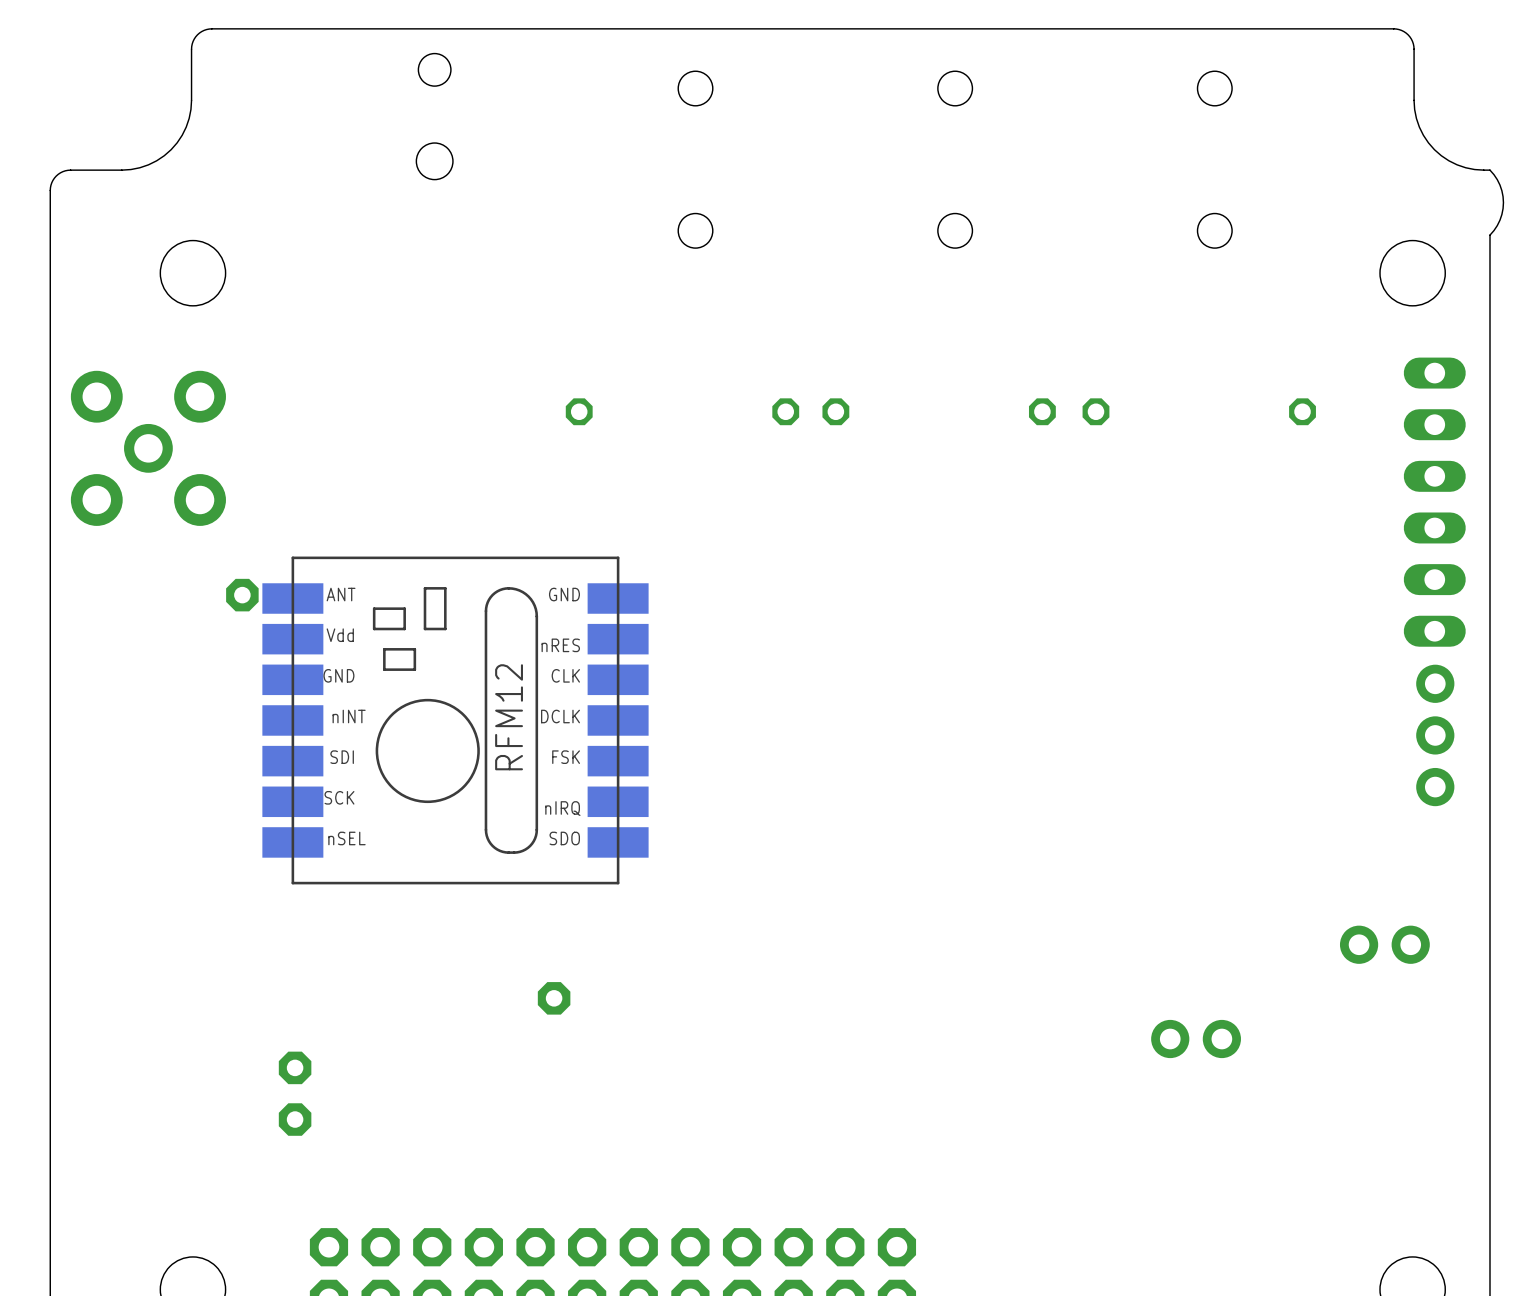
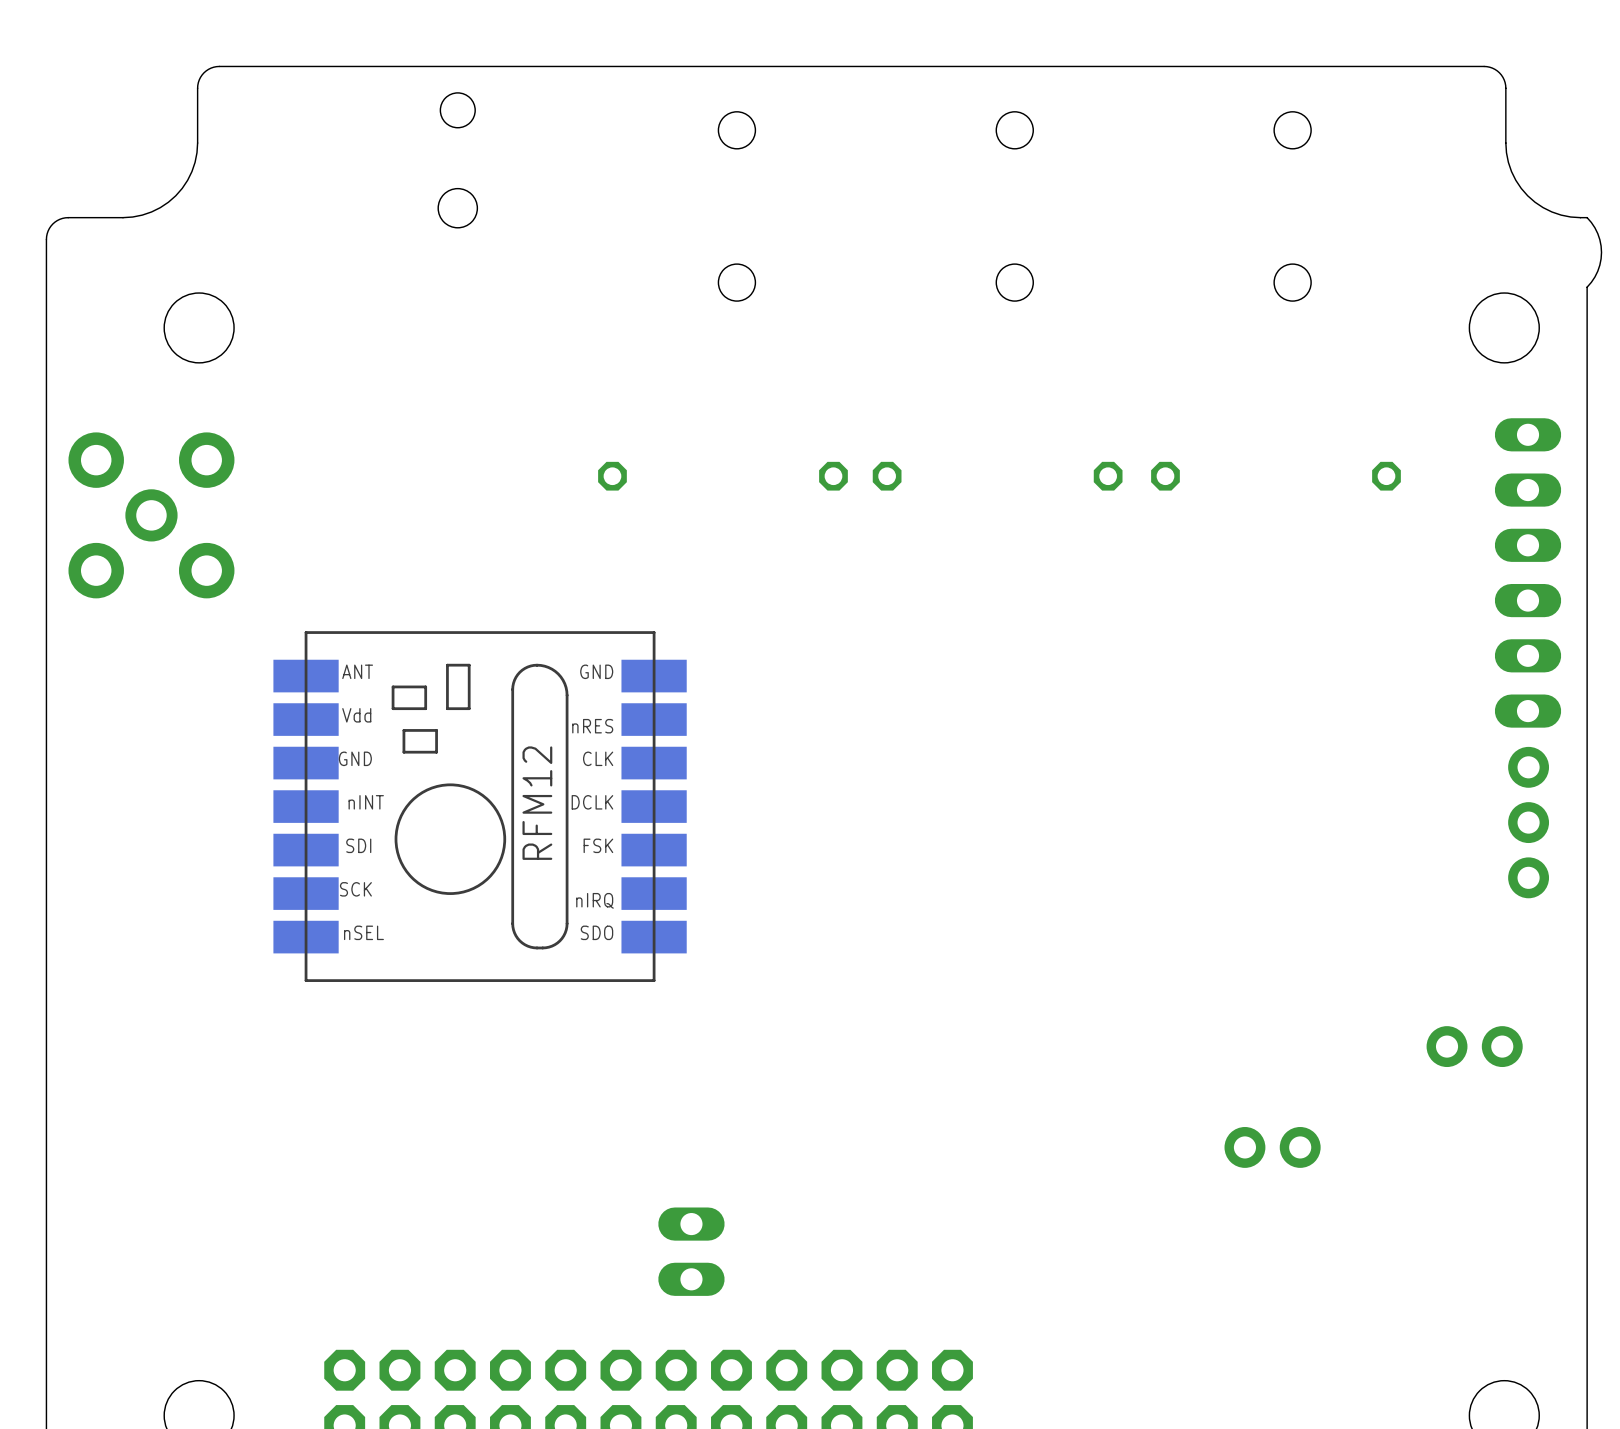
part: (242, 595) -> none
part: (554, 998) -> none
part: (295, 1067) -> none
part: (295, 1119) -> none
part: none -> (691, 1251)

